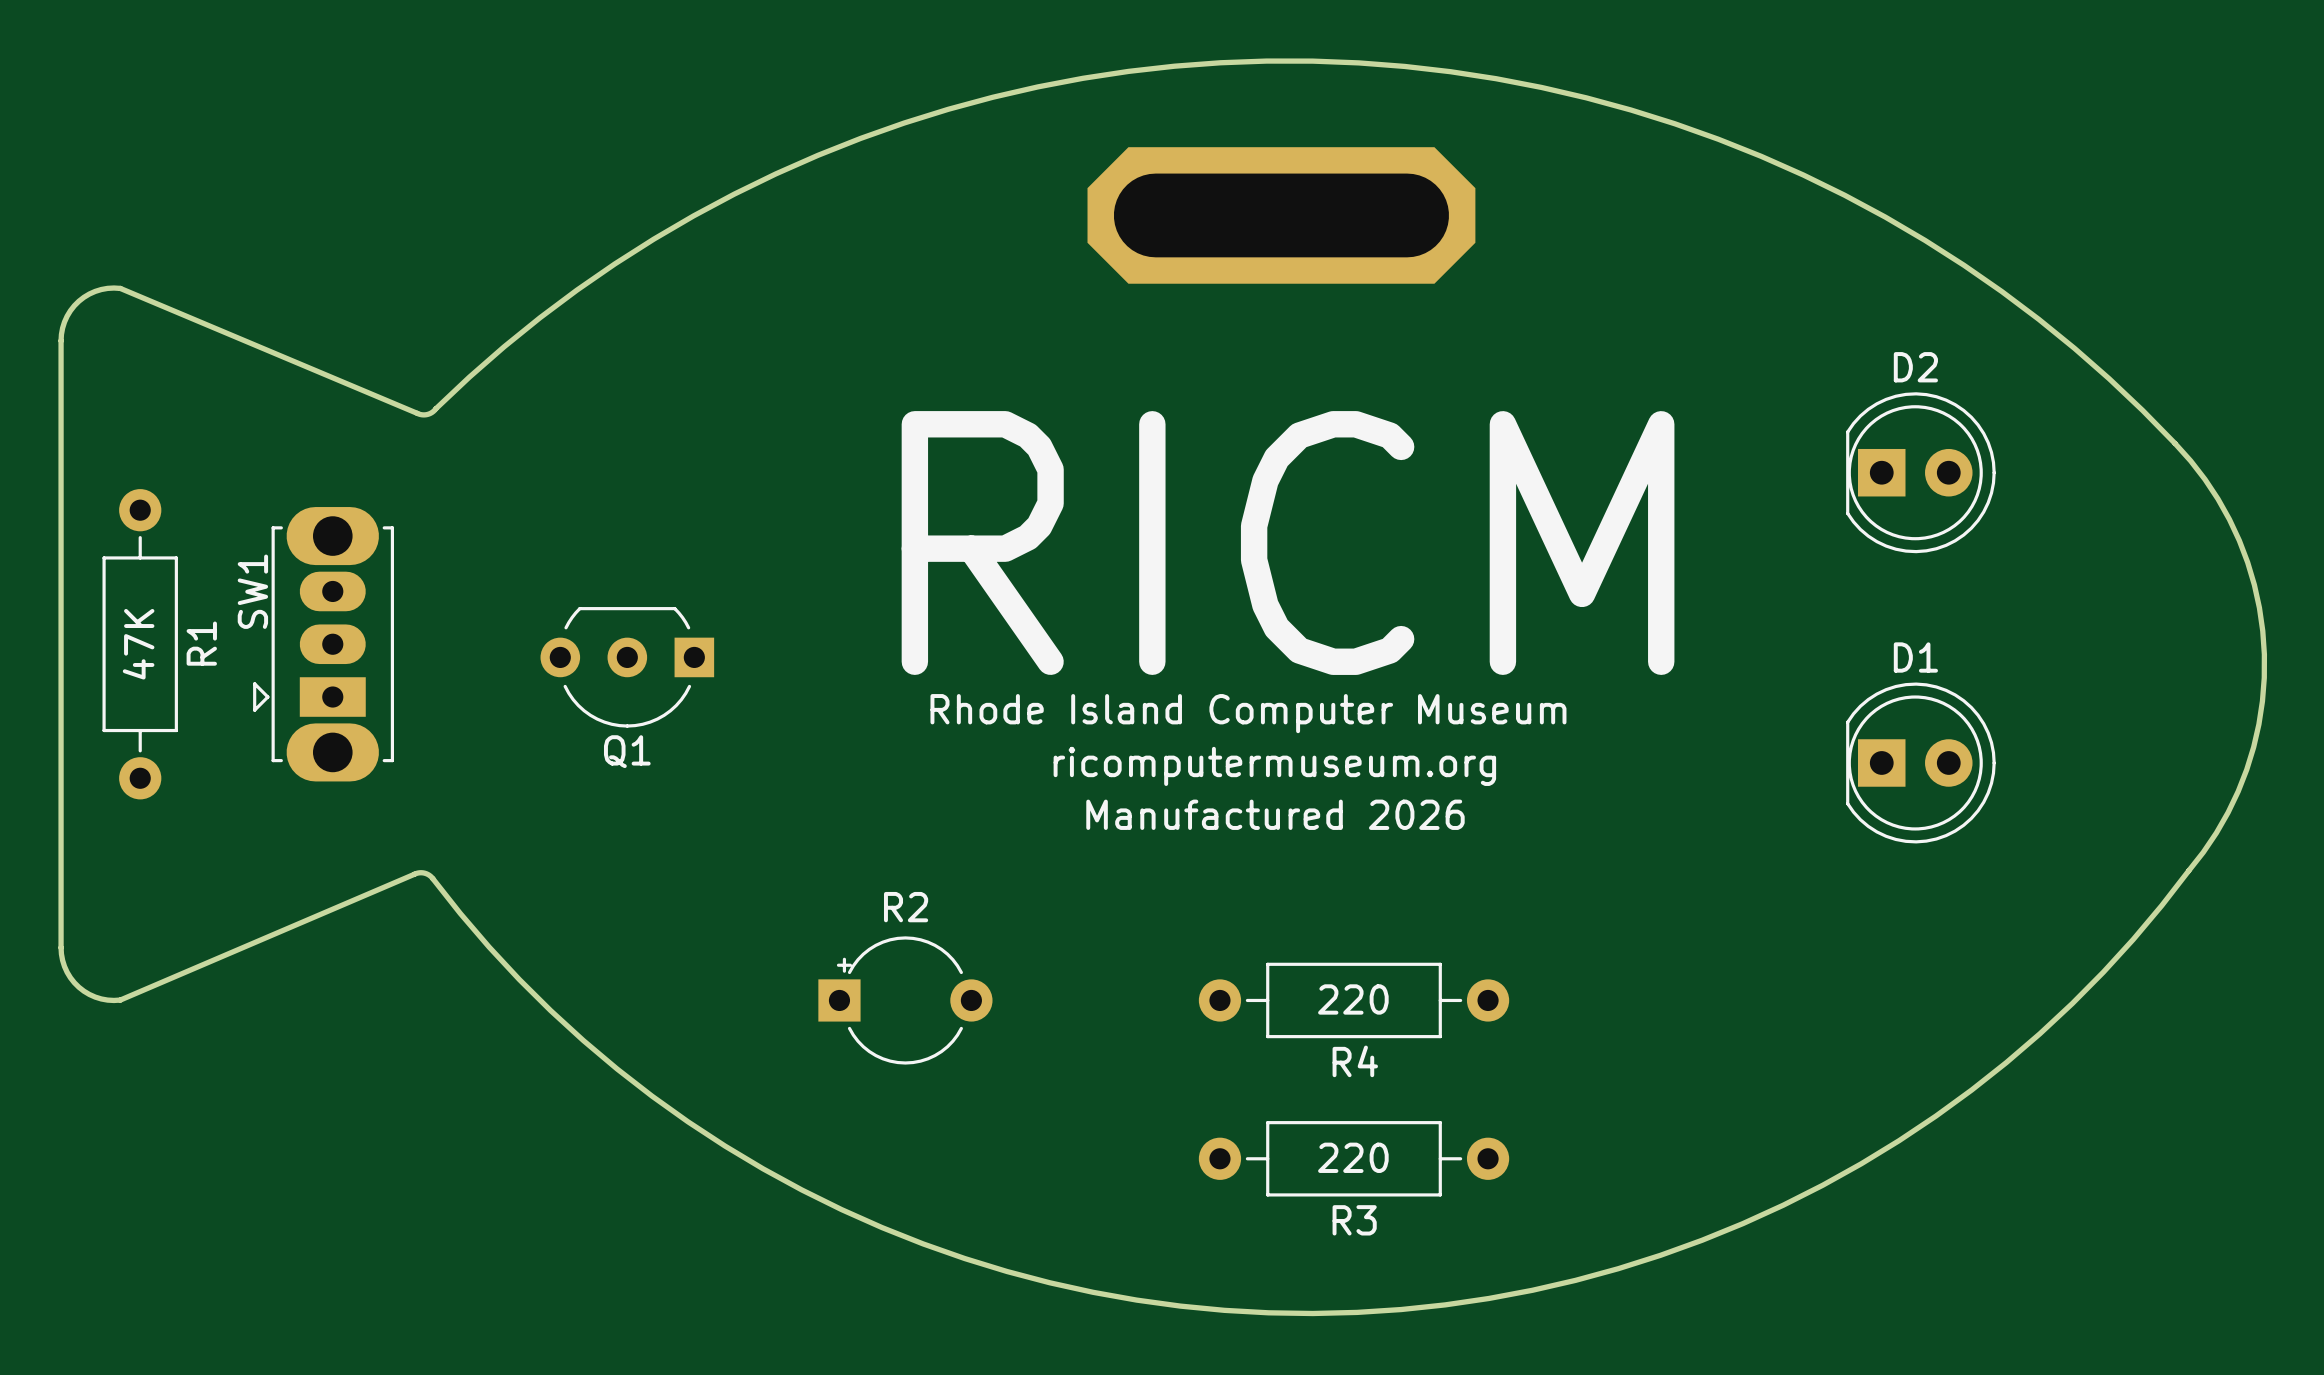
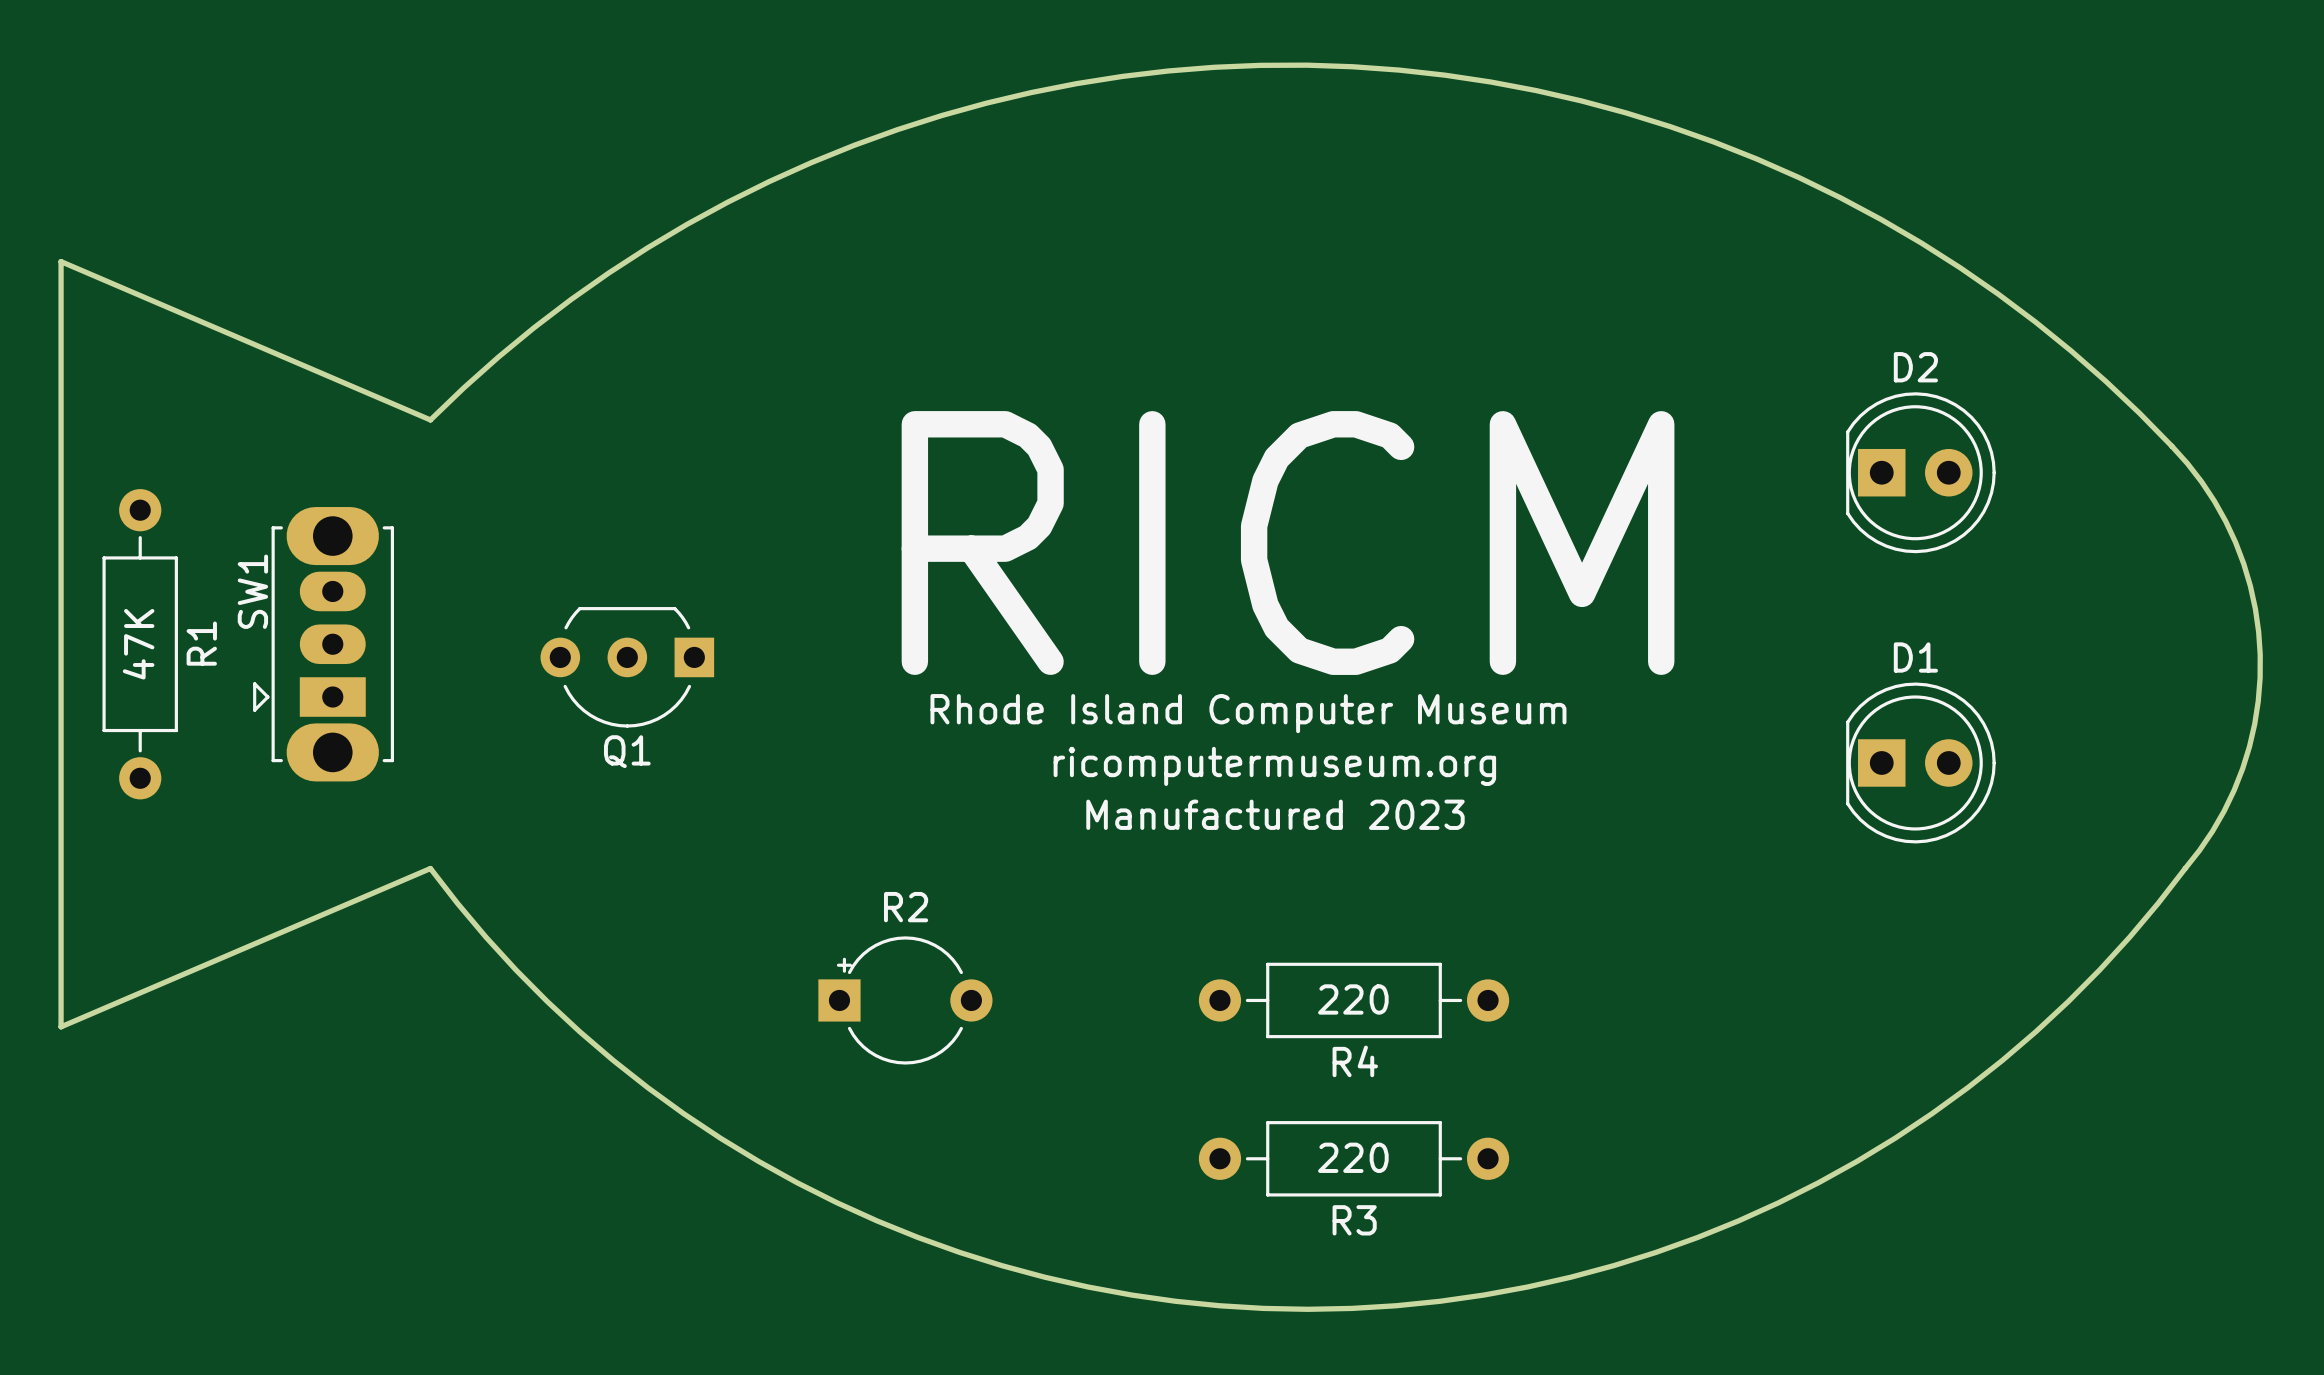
part: (1281, 215) -> none
board edge: (61, 340) (64, 322) (70, 310) (78, 301) (95, 291) (107, 288) (120, 288) (418, 414) (427, 414) (433, 411) (469, 377) (539, 317) (576, 290) (653, 239) (734, 194) (775, 173) (860, 138) (904, 123) (948, 109) (1037, 86) (1083, 78) (1174, 66) (1266, 61) (1312, 61) (1358, 62) (1450, 71) (1496, 78) (1586, 97) (1674, 123) (1718, 139) (1803, 175) (1885, 217) (1925, 240) (2001, 291) (2074, 348) (2109, 378) (2175, 443) (2205, 479) (2229, 519) (2247, 562) (2259, 607) (2264, 654) (2262, 701) (2253, 747) (2238, 791) (2216, 832) (2161, 905) (2103, 972) (2072, 1003) (2006, 1062) (1935, 1116) (1899, 1140) (1822, 1185) (1743, 1223) (1660, 1255) (1618, 1268) (1532, 1290) (1445, 1304) (1357, 1312) (1268, 1312) (1180, 1306) (1136, 1300) (1049, 1282) (1007, 1271) (964, 1258) (881, 1227) (841, 1209) (763, 1168) (688, 1121) (652, 1096) (617, 1068) (550, 1010) (489, 947) (431, 877) (424, 873) (416, 873) (120, 1000) (101, 998) (89, 994) (78, 987) (70, 977) (64, 966) (61, 947) -> (61, 340) (61, 261) (430, 419) (463, 387) (534, 327) (570, 299) (647, 247) (687, 224) (769, 181) (854, 145) (897, 129) (986, 103) (1031, 92) (1122, 76) (1168, 70) (1214, 67) (1306, 65) (1399, 70) (1445, 75) (1536, 90) (1581, 100) (1670, 126) (1713, 141) (1799, 177) (1881, 219) (1921, 243) (1998, 294) (2071, 351) (2106, 381) (2172, 446) (2201, 481) (2225, 521) (2243, 564) (2255, 608) (2260, 654) (2258, 701) (2249, 746) (2234, 790) (2212, 831) (2158, 903) (2099, 970) (2036, 1031) (1967, 1087) (1894, 1138) (1818, 1182) (1778, 1202) (1697, 1237) (1613, 1265) (1570, 1277) (1527, 1286) (1440, 1301) (1352, 1308) (1307, 1309) (1263, 1308) (1175, 1301) (1087, 1286) (1002, 1265) (918, 1237) (877, 1220) (797, 1182) (720, 1138) (683, 1113) (613, 1060) (579, 1031) (516, 970) (457, 903) (430, 868) (61, 1026) (61, 947)
text: Manufactured 2026 (1275, 814) -> Manufactured 2023 (1275, 814)

